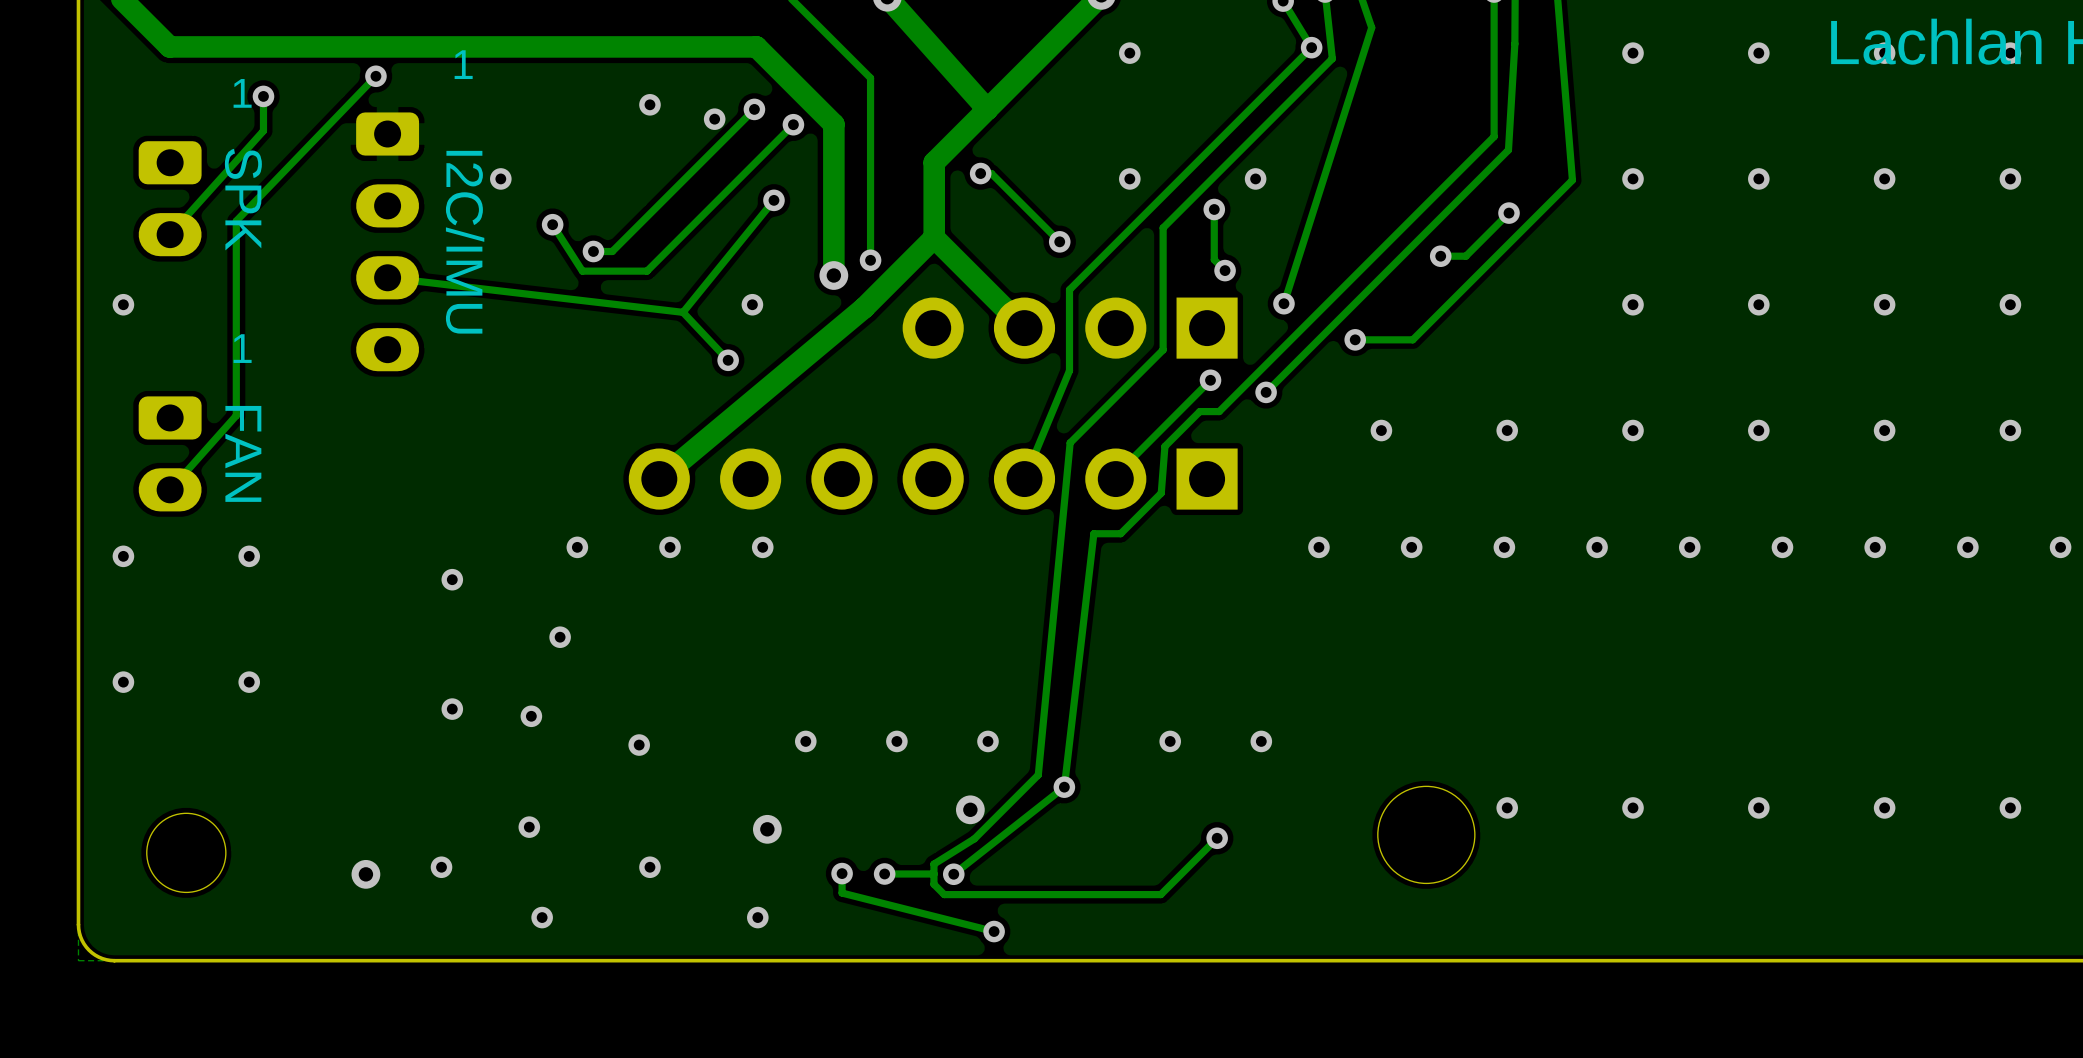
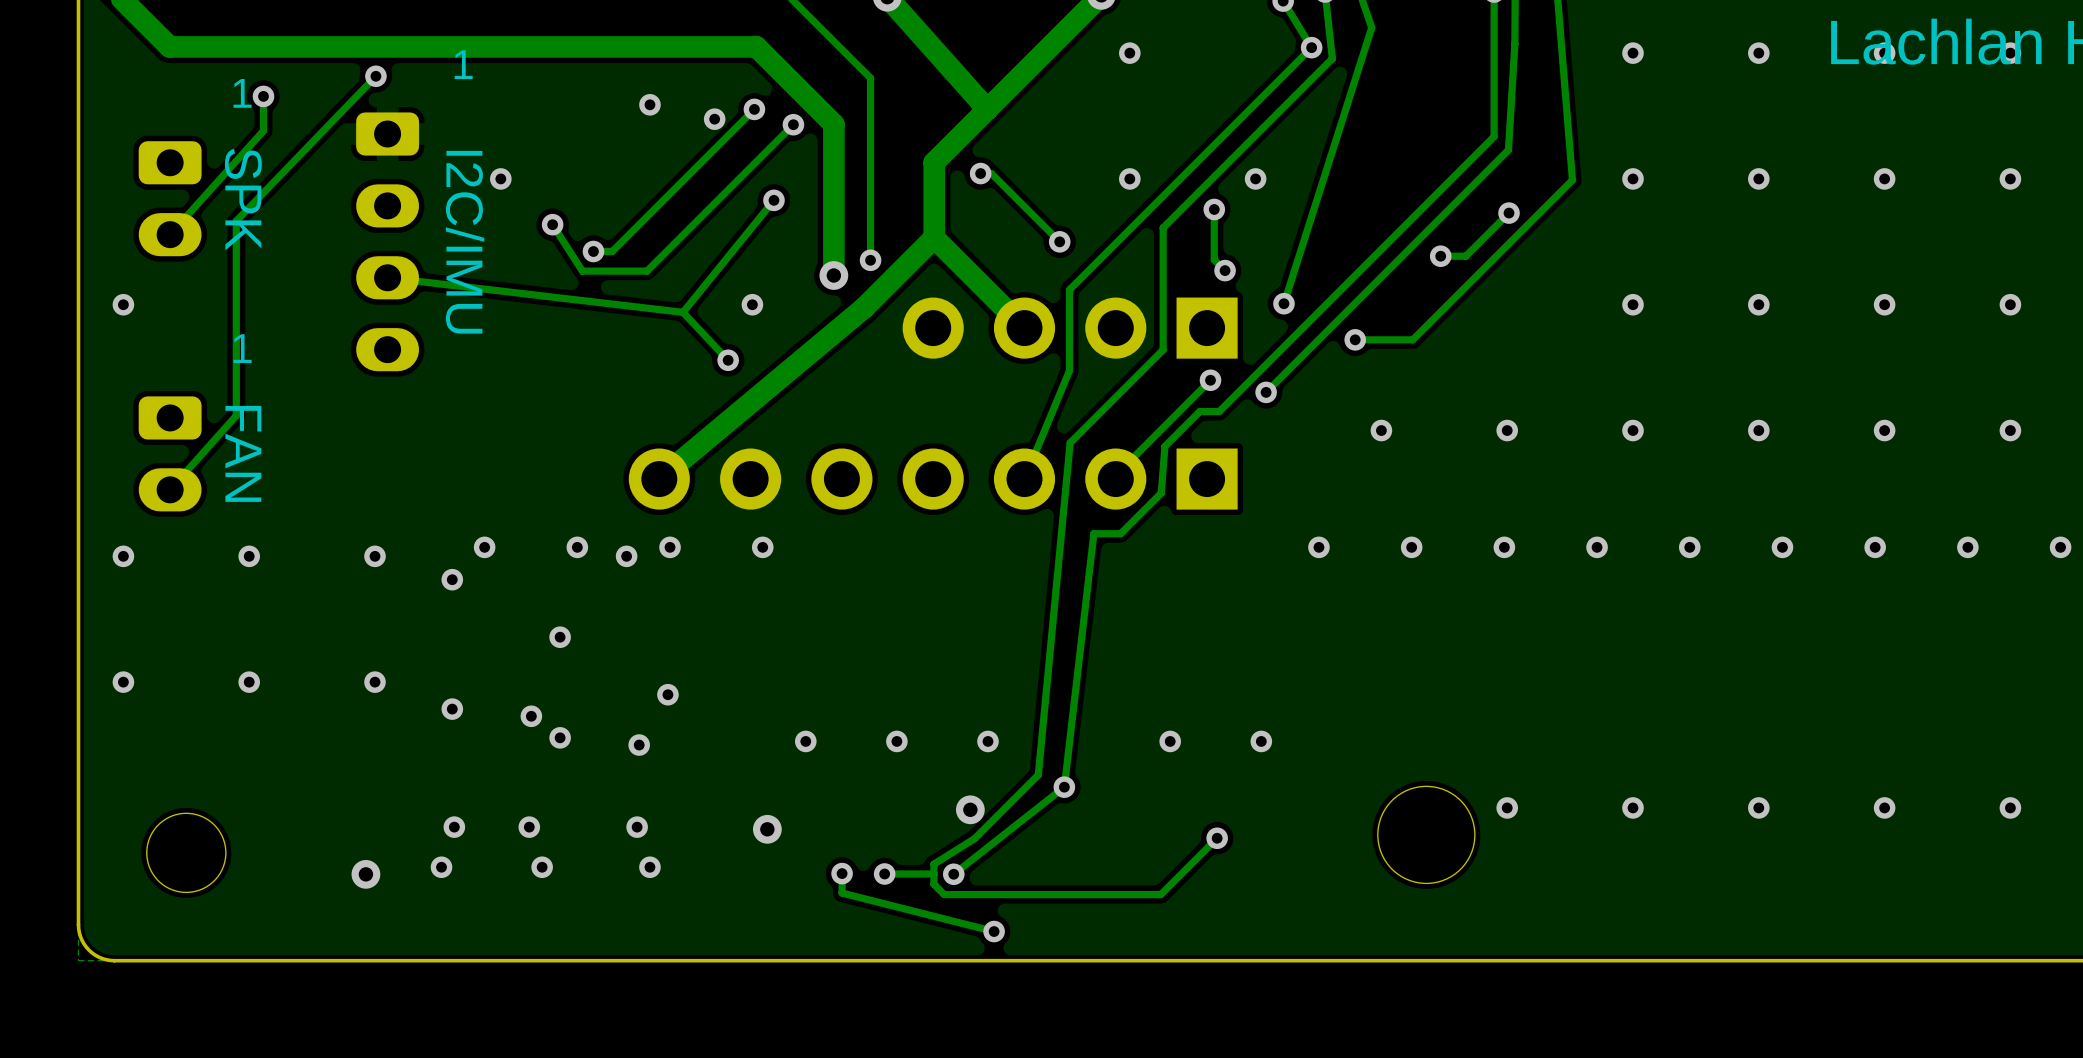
via: none -> (484, 547)
via: none -> (375, 556)
via: none -> (626, 556)
via: none -> (375, 682)
via: none -> (667, 694)
via: none -> (560, 737)
via: none -> (454, 827)
via: none -> (637, 827)
via position: (542, 917) -> (542, 867)
via: (757, 917) -> none

